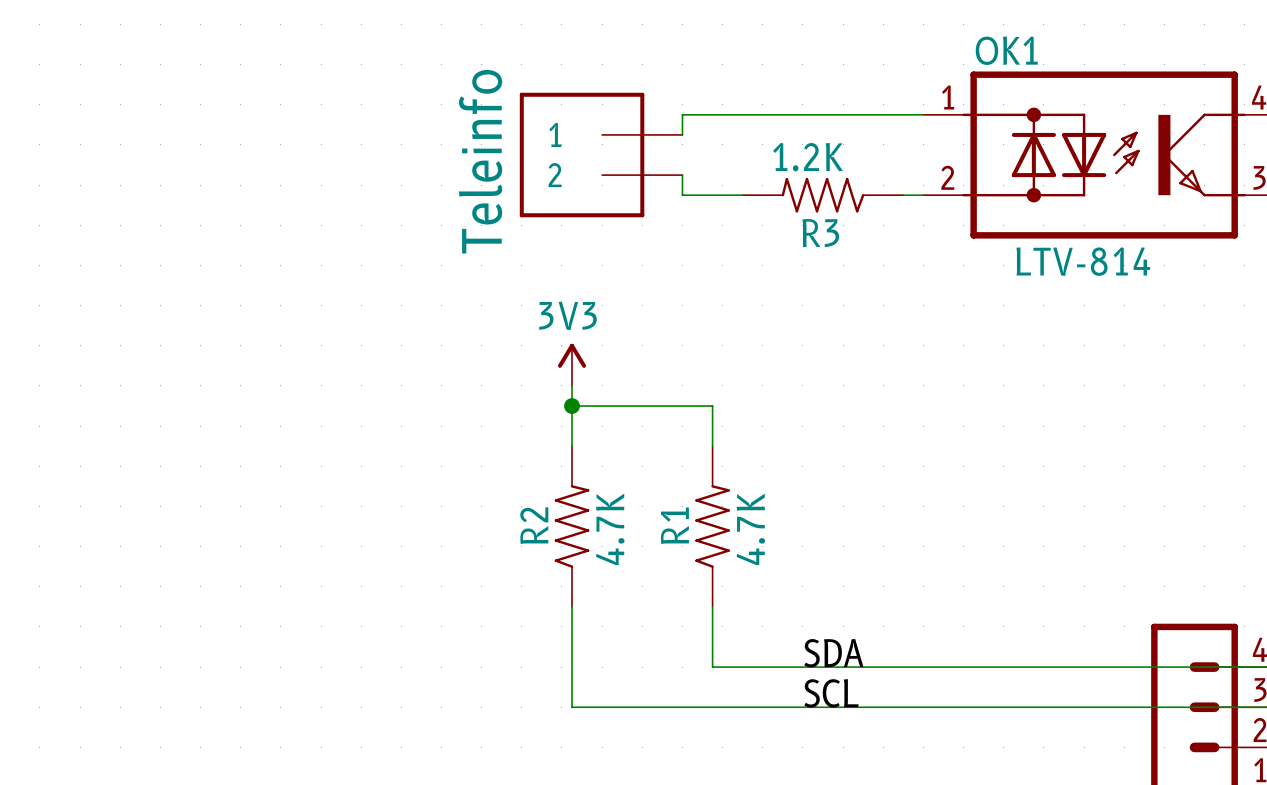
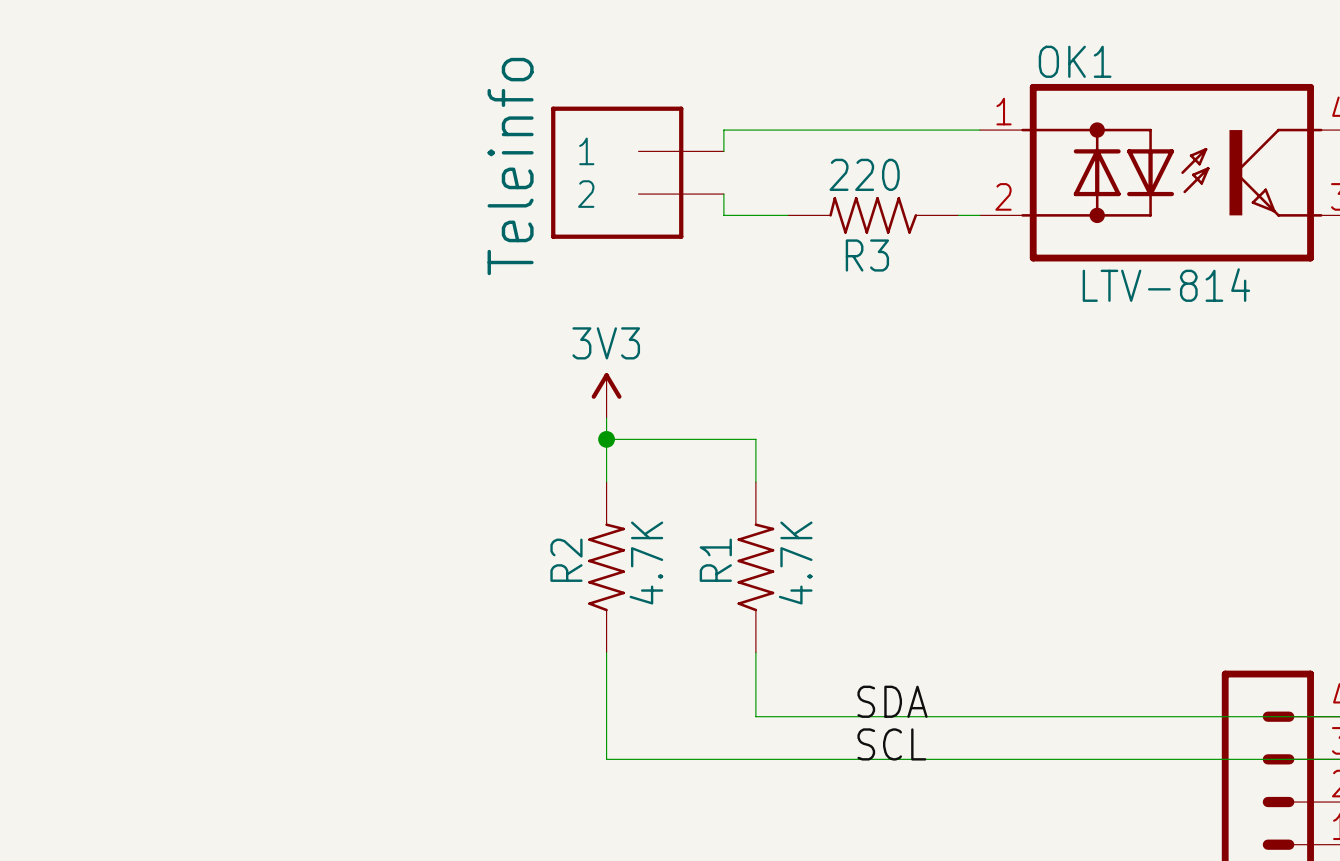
R3 value: 1.2K (808, 157) -> 220 (864, 174)

